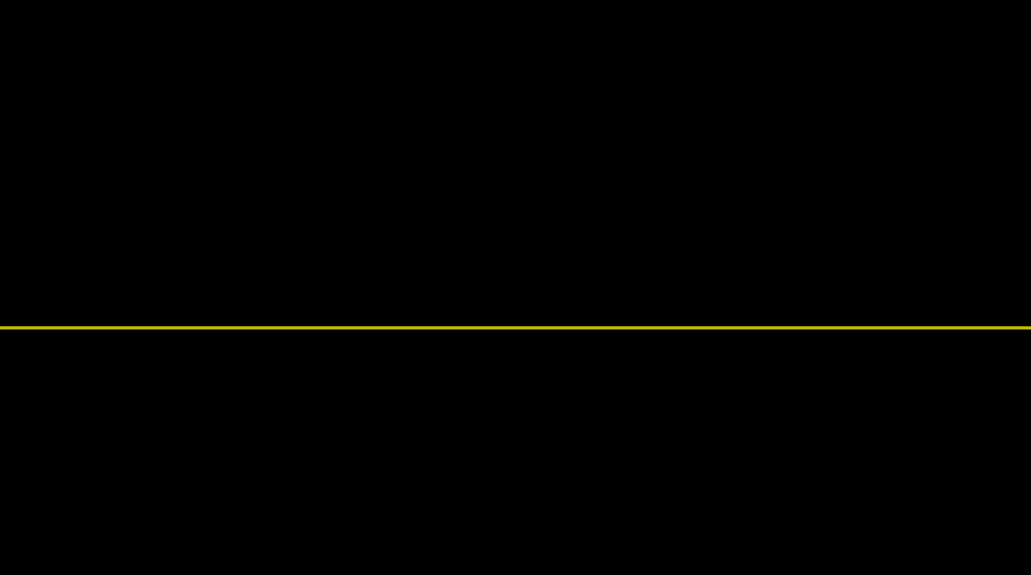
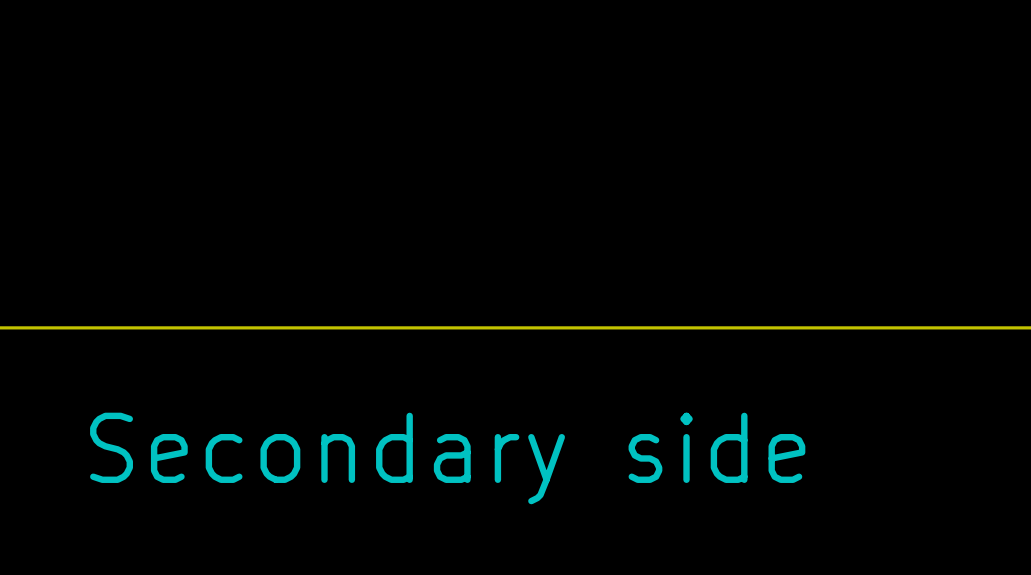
text: none -> Secondary side (447, 458)

